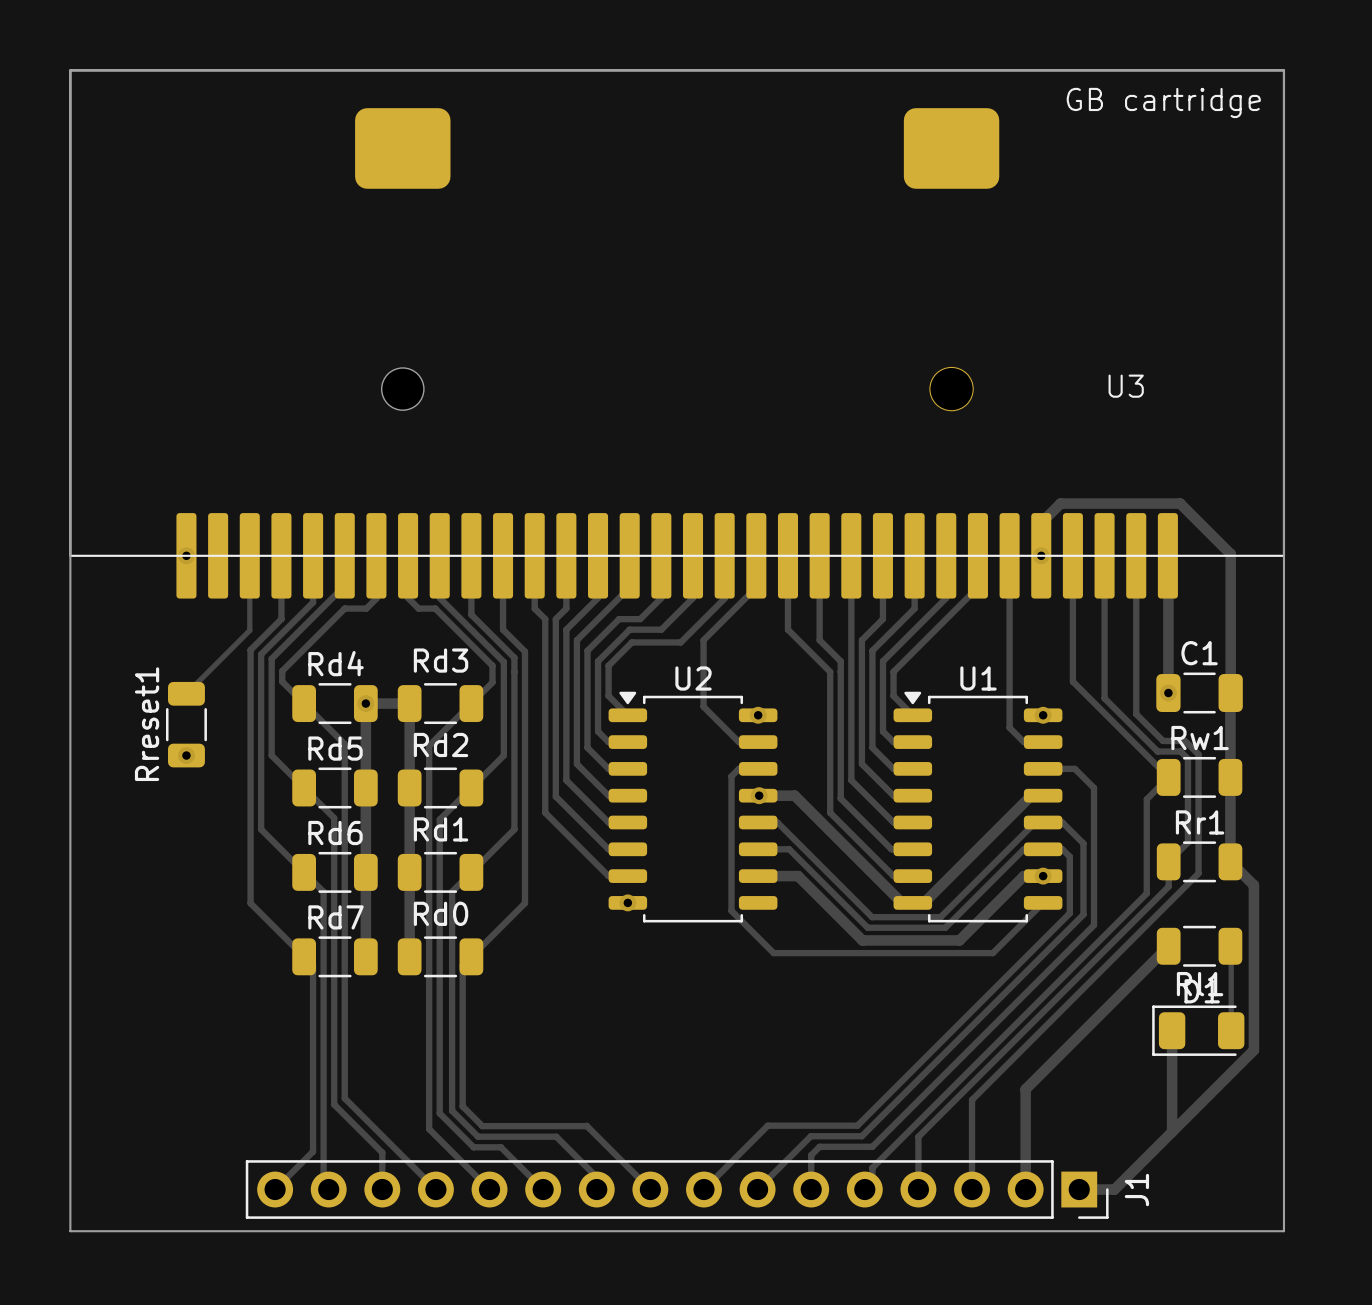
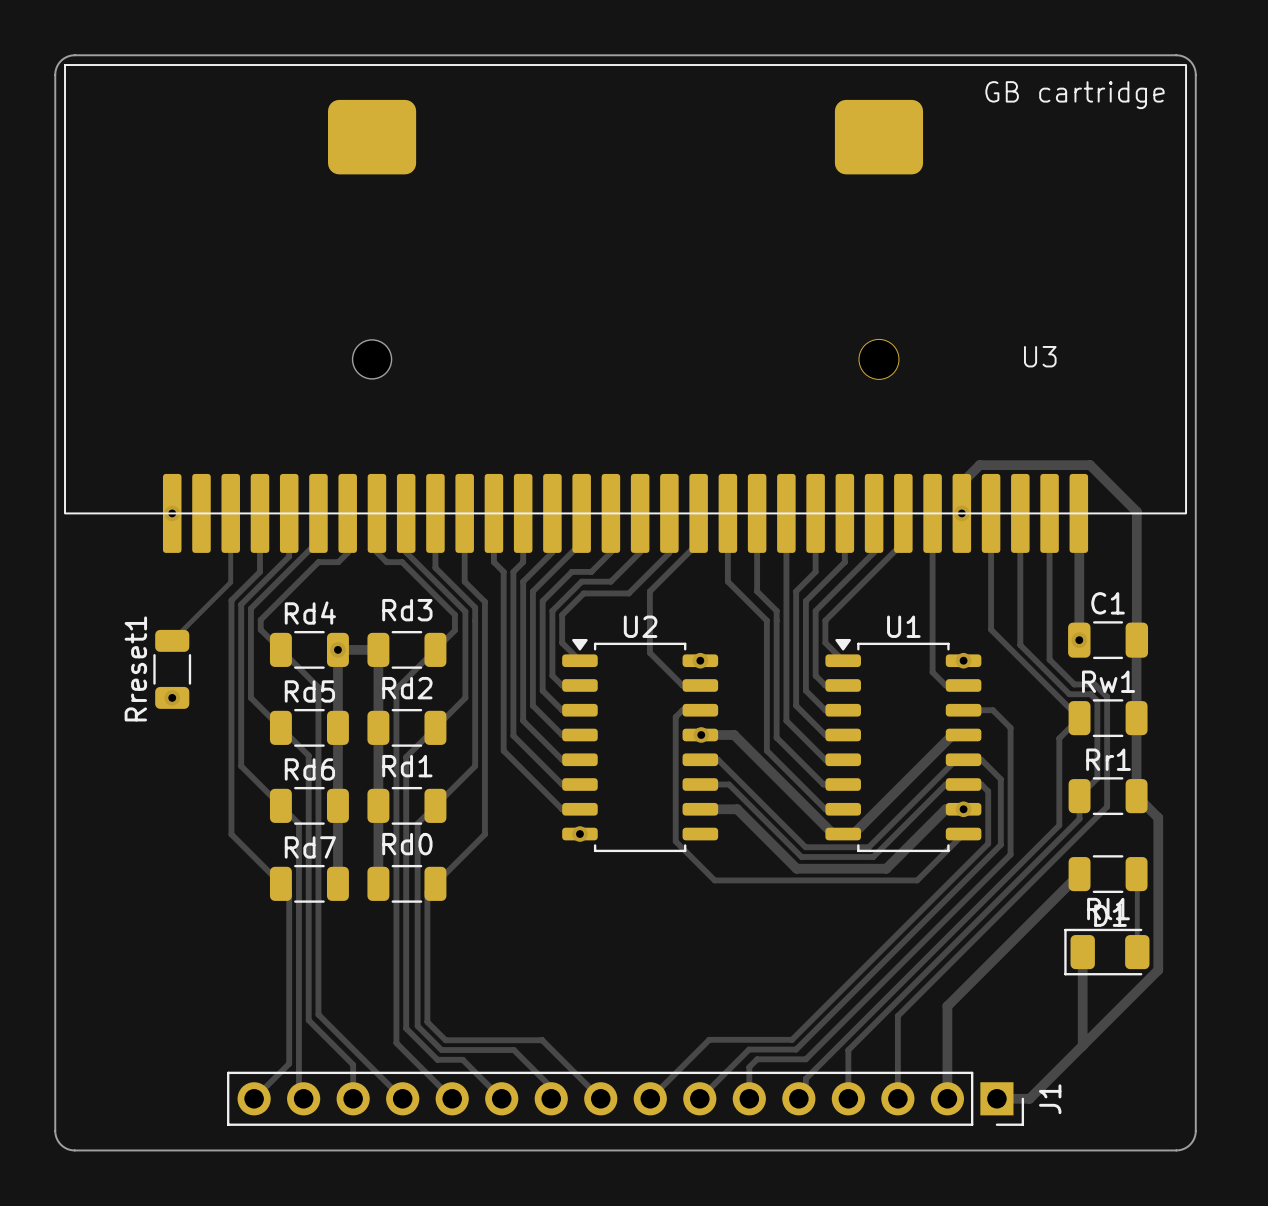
board edge: (70, 70) (1283, 70) (1283, 1231) (70, 1231) (70, 70) -> (74, 55) (60, 60) (55, 74) (55, 1130) (60, 1144) (74, 1150) (1176, 1150) (1190, 1144) (1195, 1130) (1195, 74) (1190, 60) (1176, 55) (74, 55)

